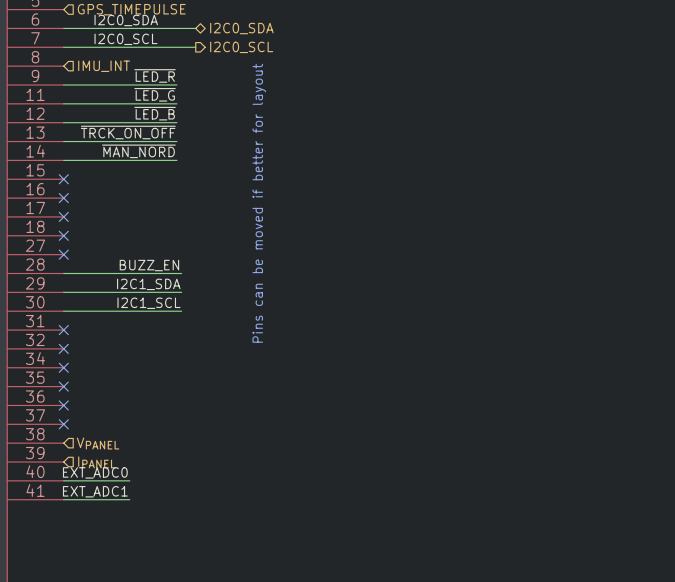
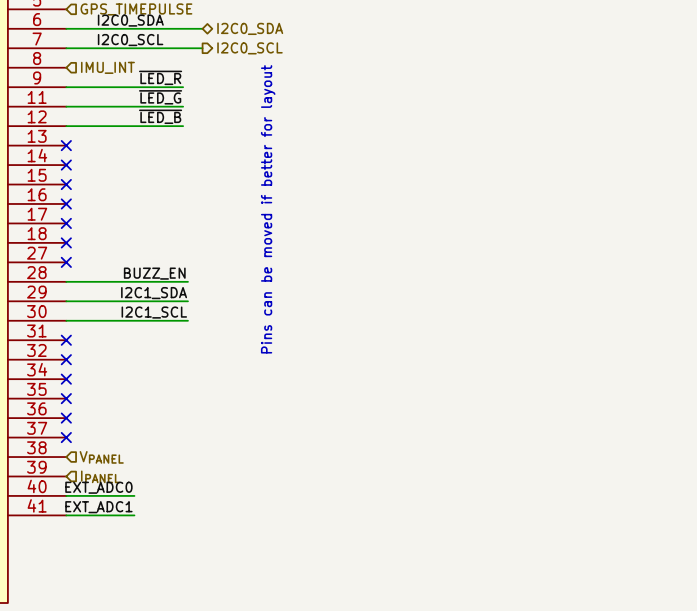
label: ~{TRCK_ON_OFF} (128, 132) -> none
wire: (63, 141) (176, 141) -> none
no-connect mark: none -> (66, 145)
label: ~{MAN_NORD} (138, 151) -> none
wire: (63, 160) (176, 160) -> none
no-connect mark: none -> (66, 165)

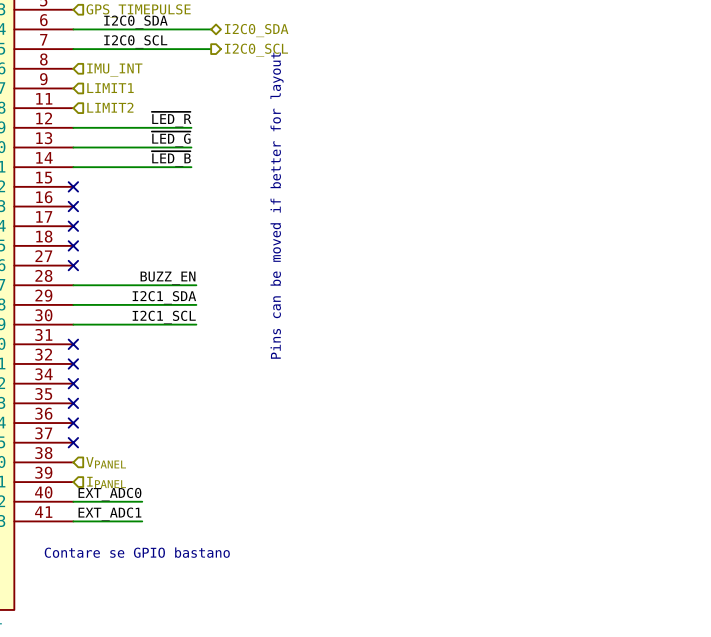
label: ~{LED_R} (160, 77) -> none
hierarchical label: none -> LIMIT1 (110, 88)
wire: (66, 87) (183, 87) -> (73, 167) (191, 167)
label position: ~{LED_G} (160, 97) -> ~{LED_G} (171, 139)
wire: (66, 106) (183, 106) -> (73, 147) (191, 147)
hierarchical label: none -> LIMIT2 (110, 107)
label: ~{LED_B} (160, 116) -> ~{LED_R} (171, 119)
no-connect mark: (66, 145) -> none
label: none -> ~{LED_B} (171, 158)
no-connect mark: (66, 165) -> none
text: none -> Contare se GPIO bastano (137, 552)

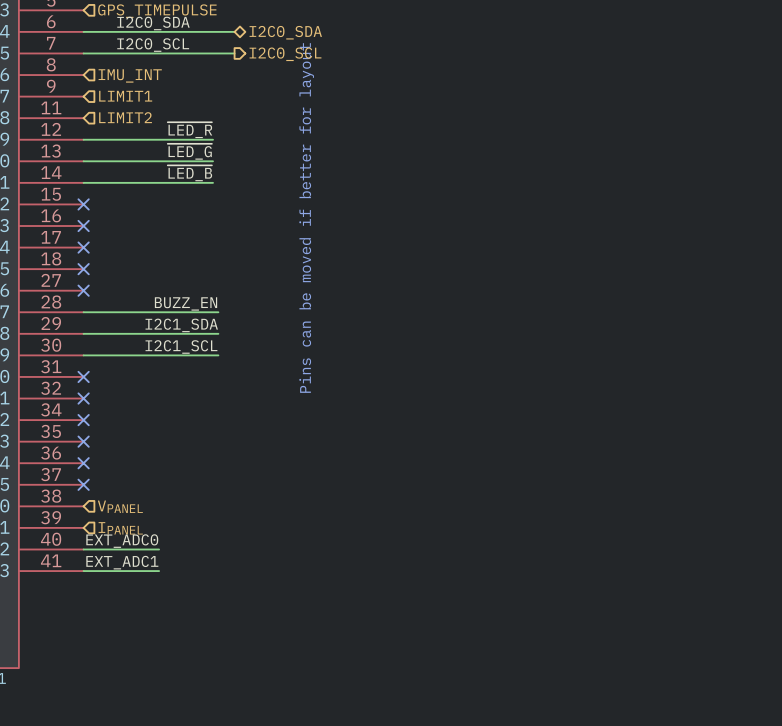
text: Contare se GPIO bastano (137, 552) -> none

